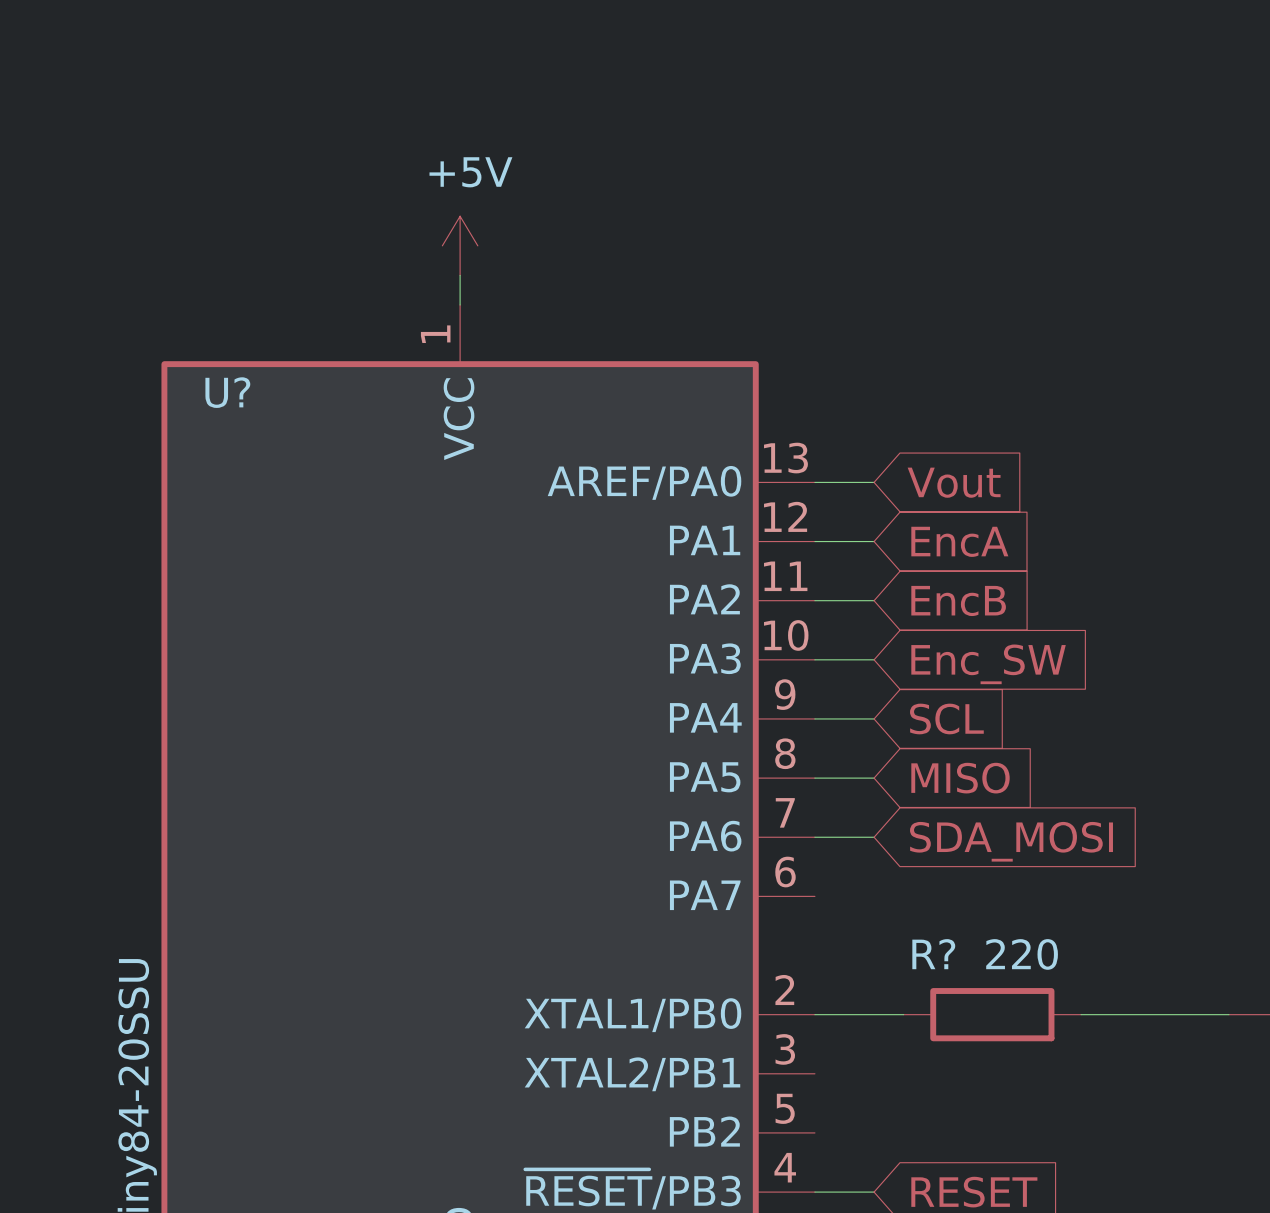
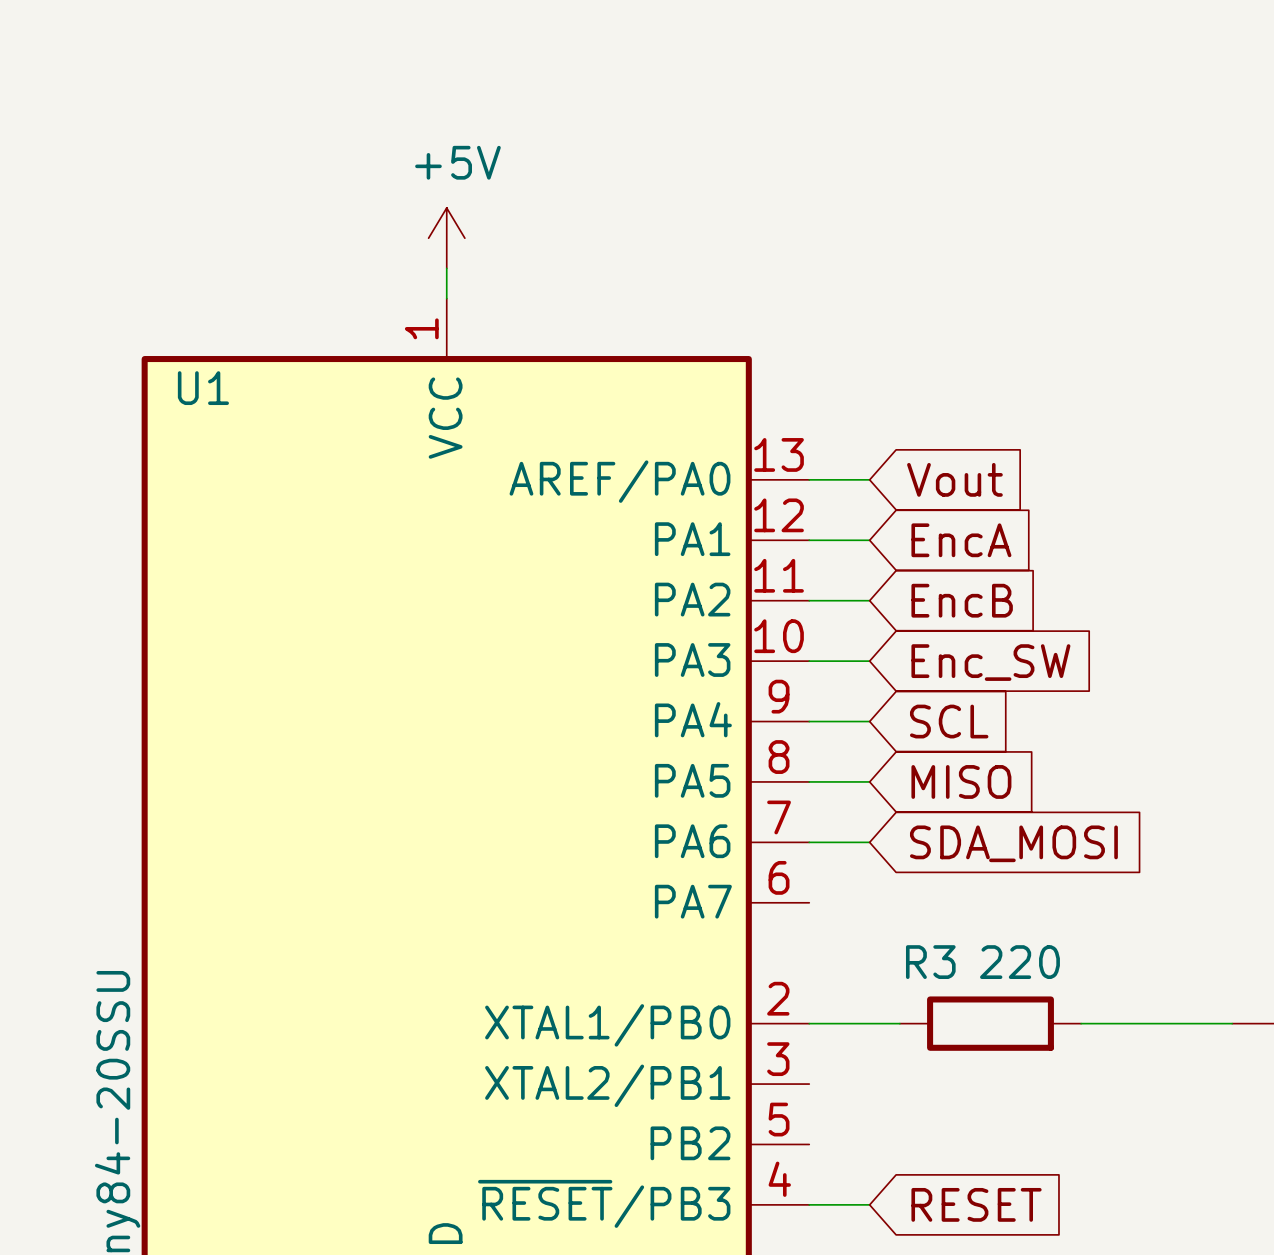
U? name: U? (227, 392) -> U1 (203, 388)
R? name: R? (933, 954) -> R3 (930, 962)

